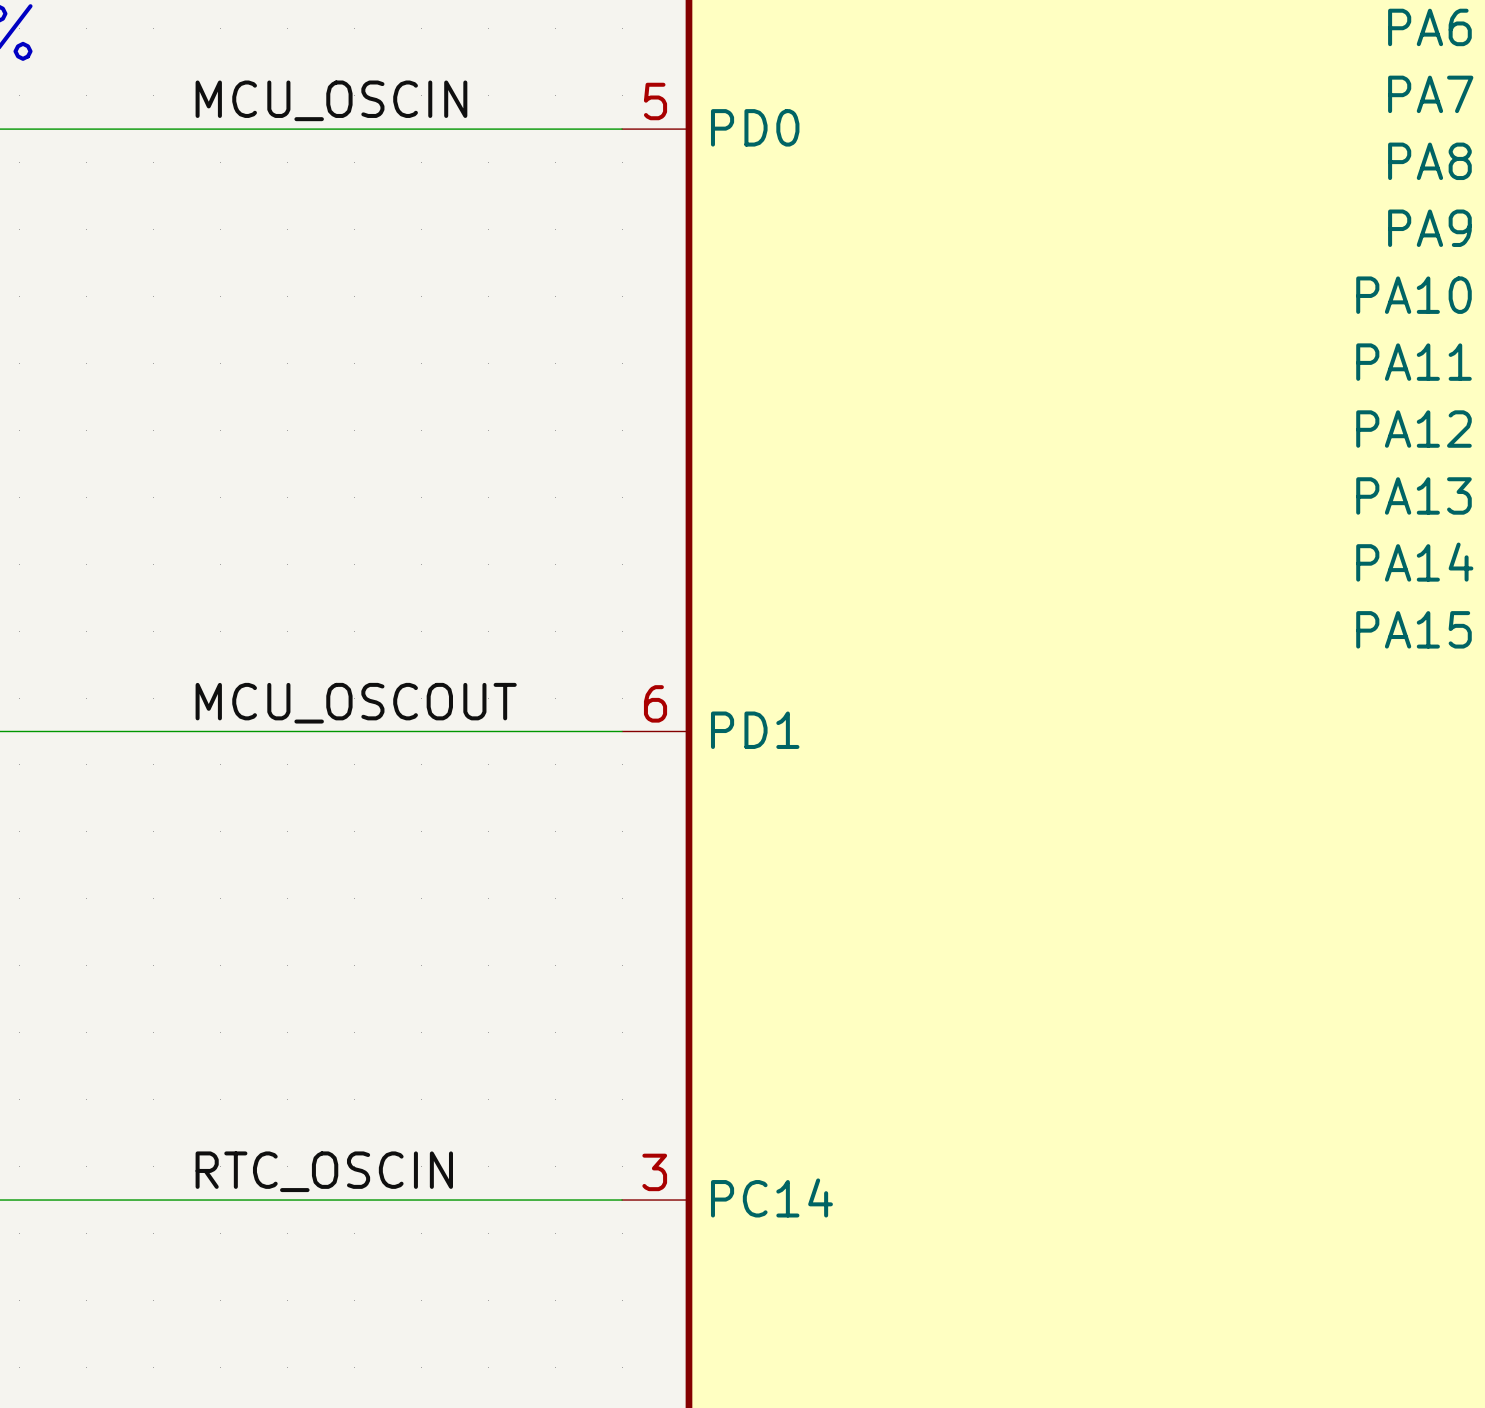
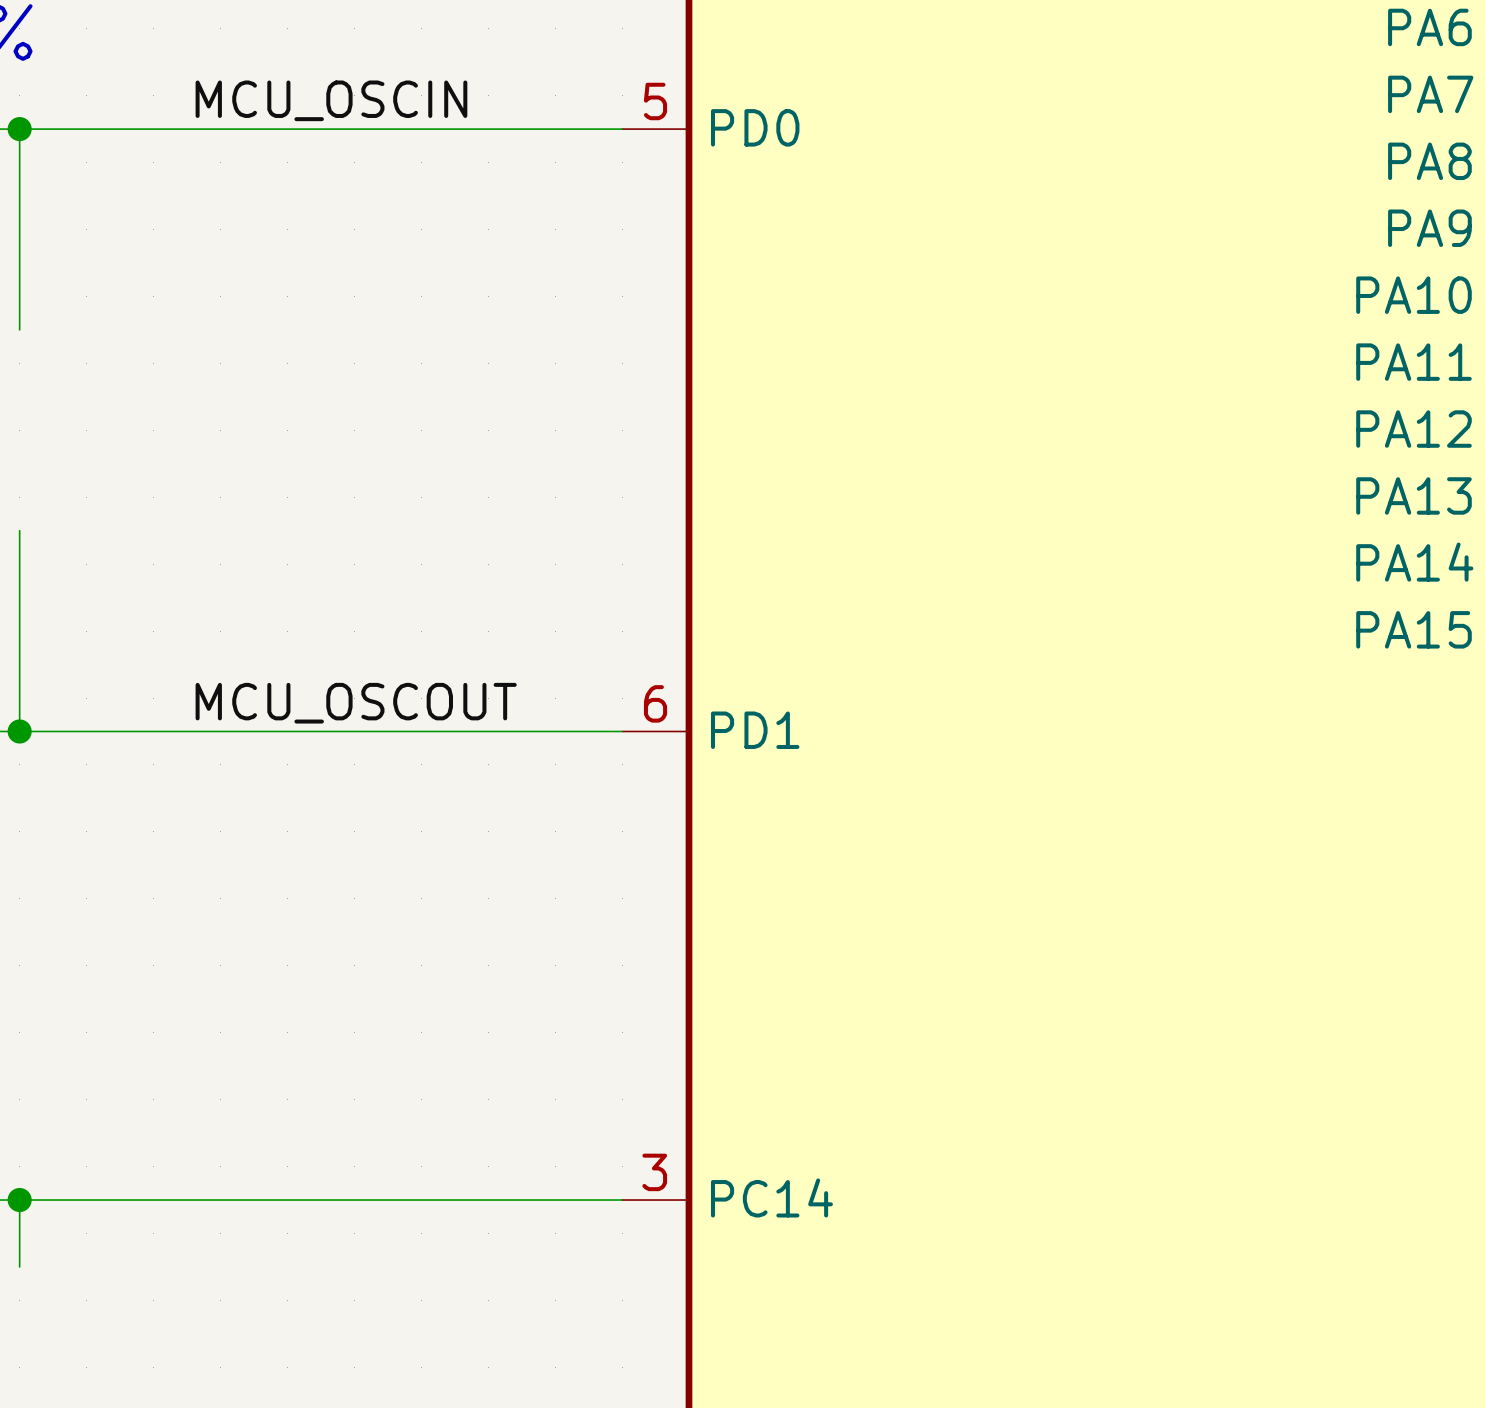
wire: none -> (19, 129) (19, 329)
junction: none -> (19, 129)
wire: none -> (19, 530) (19, 731)
junction: none -> (19, 731)
label: RTC_OSCIN (324, 1171) -> none
wire: none -> (19, 1200) (19, 1266)
junction: none -> (19, 1200)

